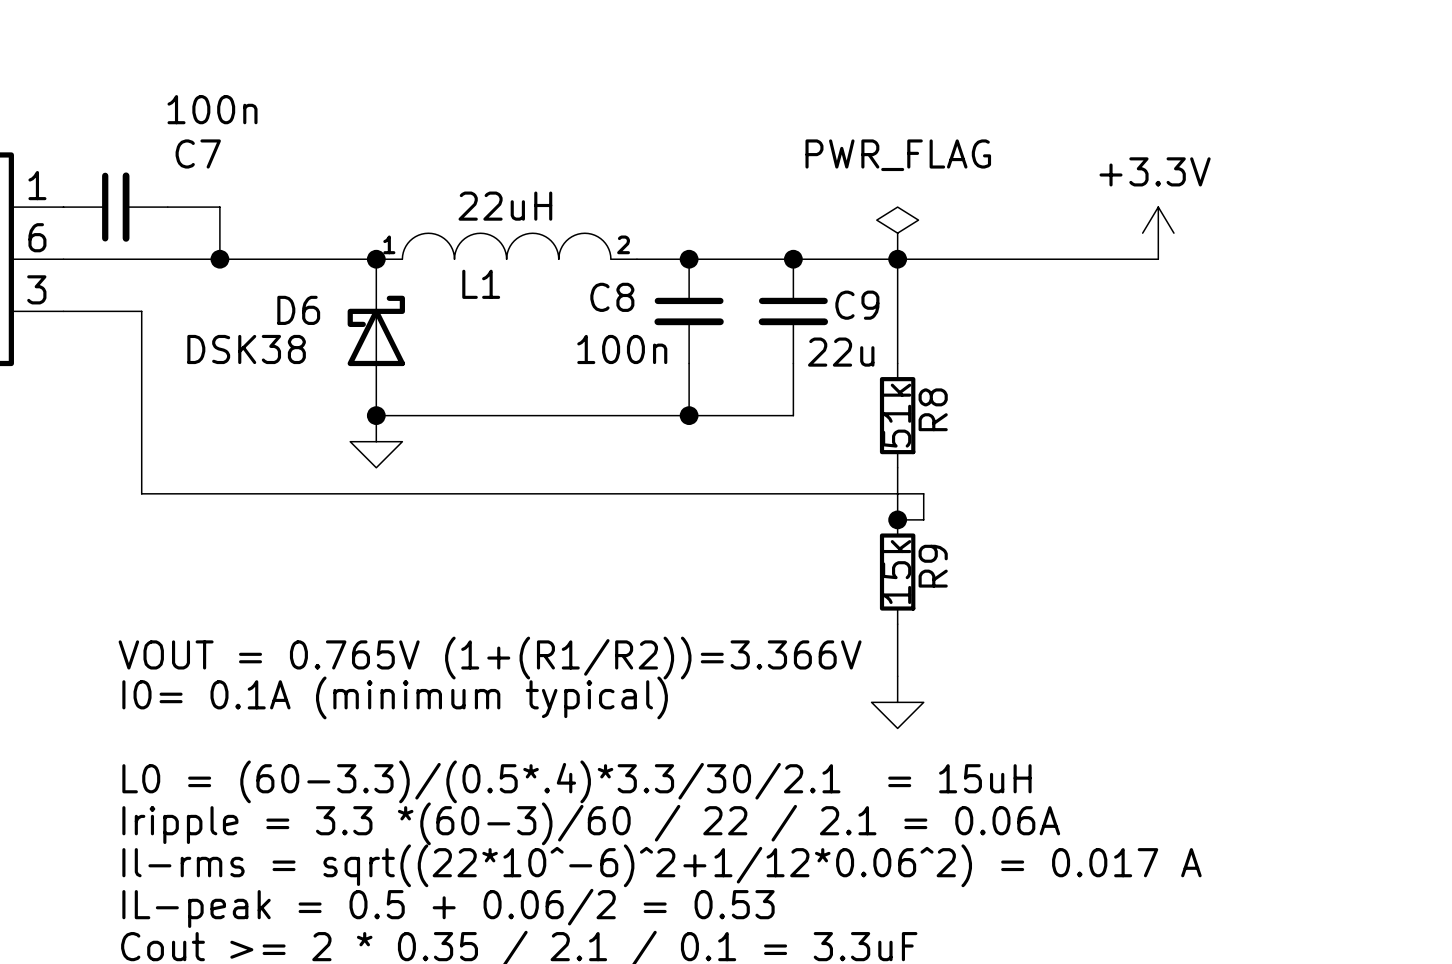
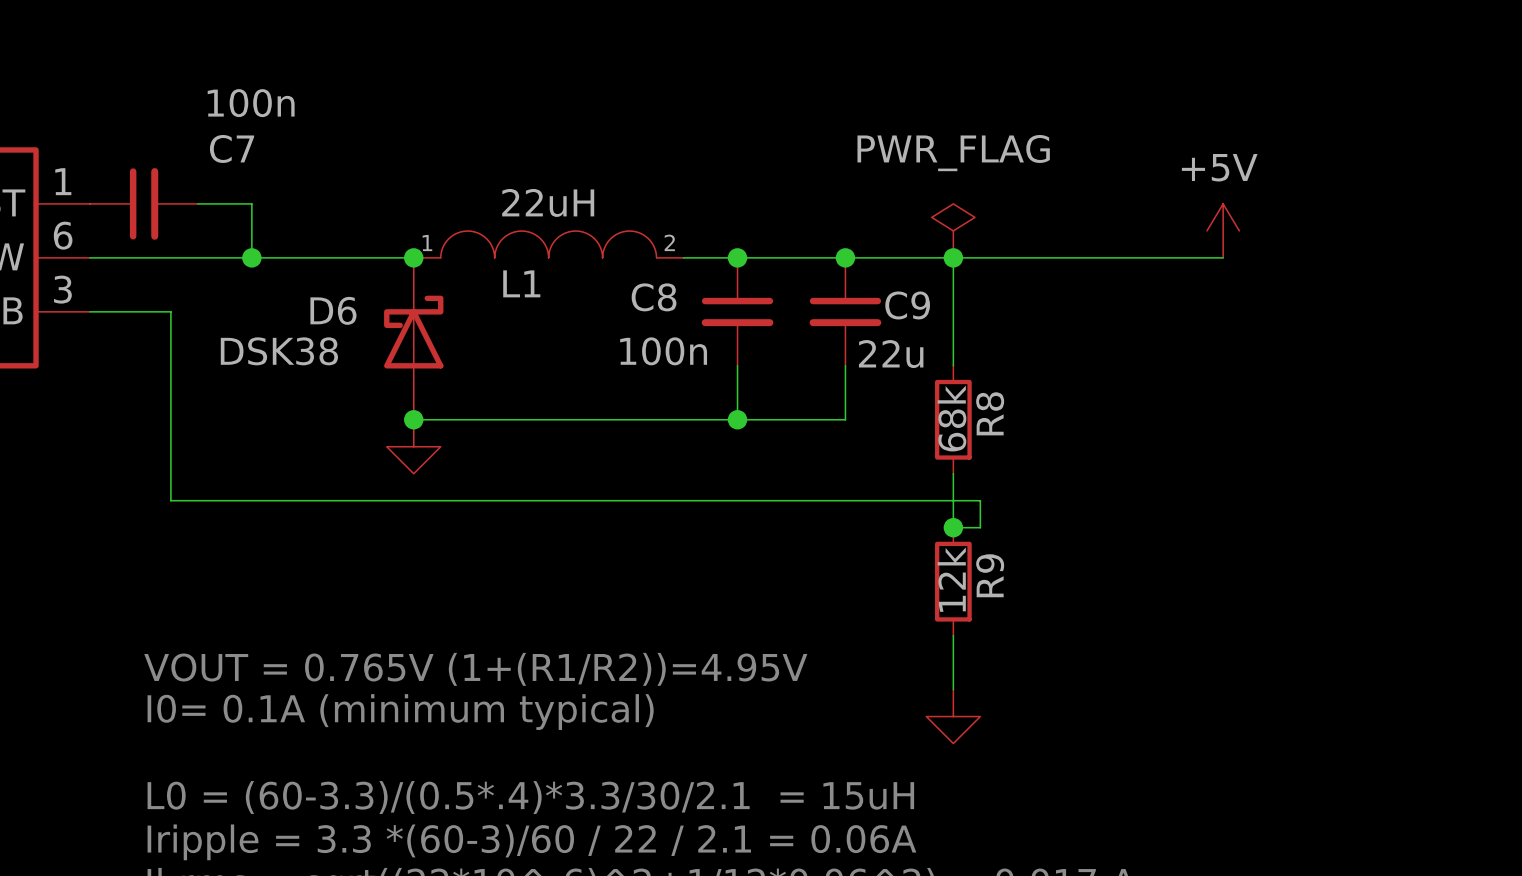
power symbol: +3.3V (1158, 233) -> +5V (1223, 230)
R8 value: 51k (896, 415) -> 68k (952, 418)
R9 value: 15k (896, 572) -> 12k (951, 579)
text: VOUT = 0.765V (1+(R1/R2))=3.366V (490, 658) -> VOUT = 0.765V (1+(R1/R2))=4.95V (475, 669)

